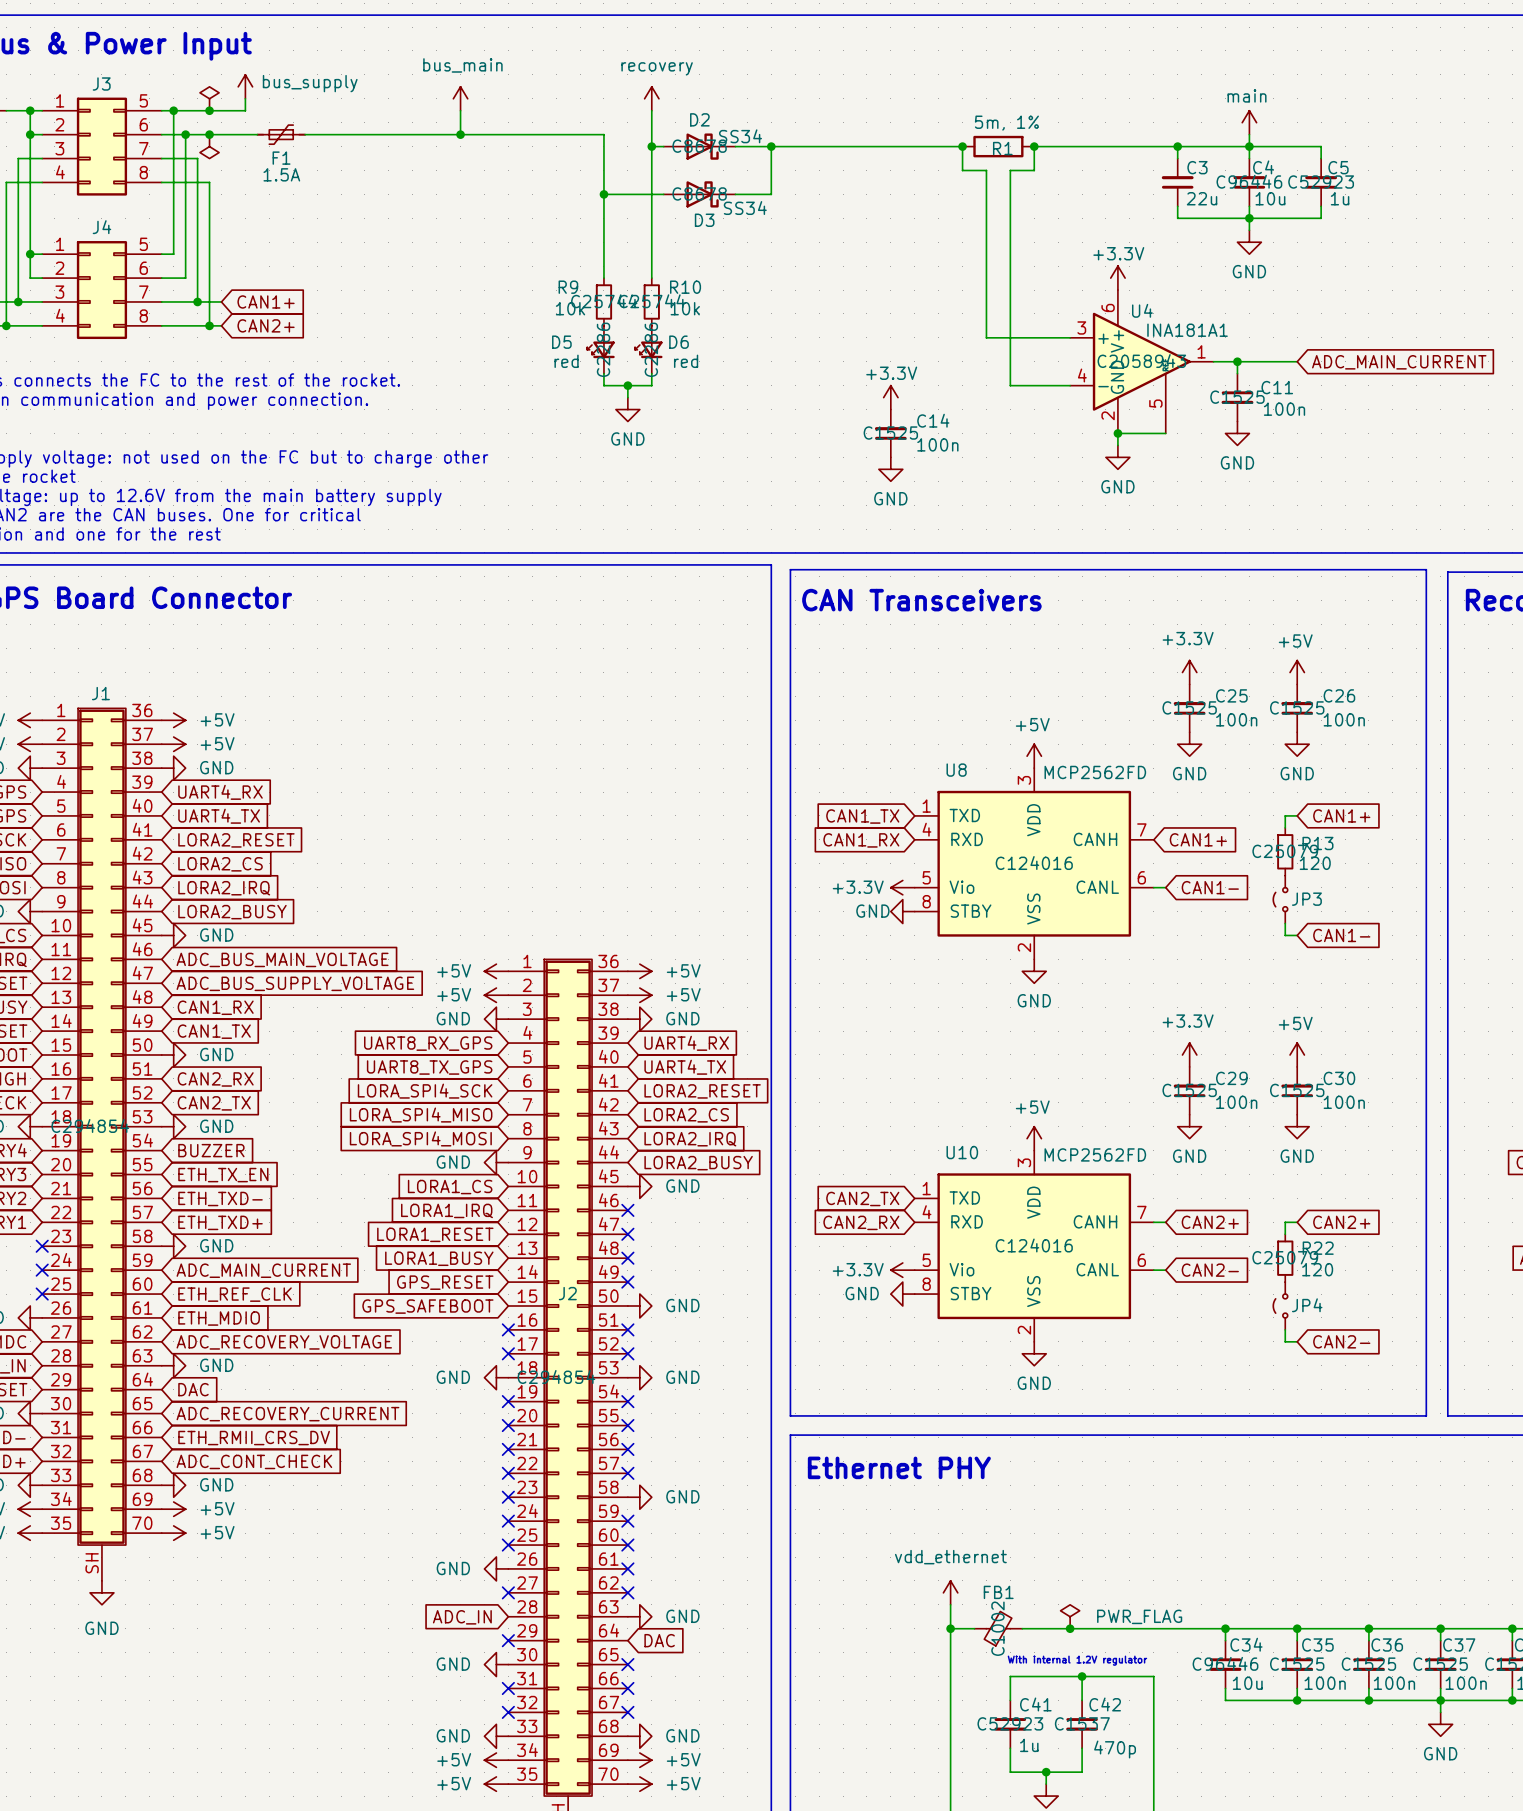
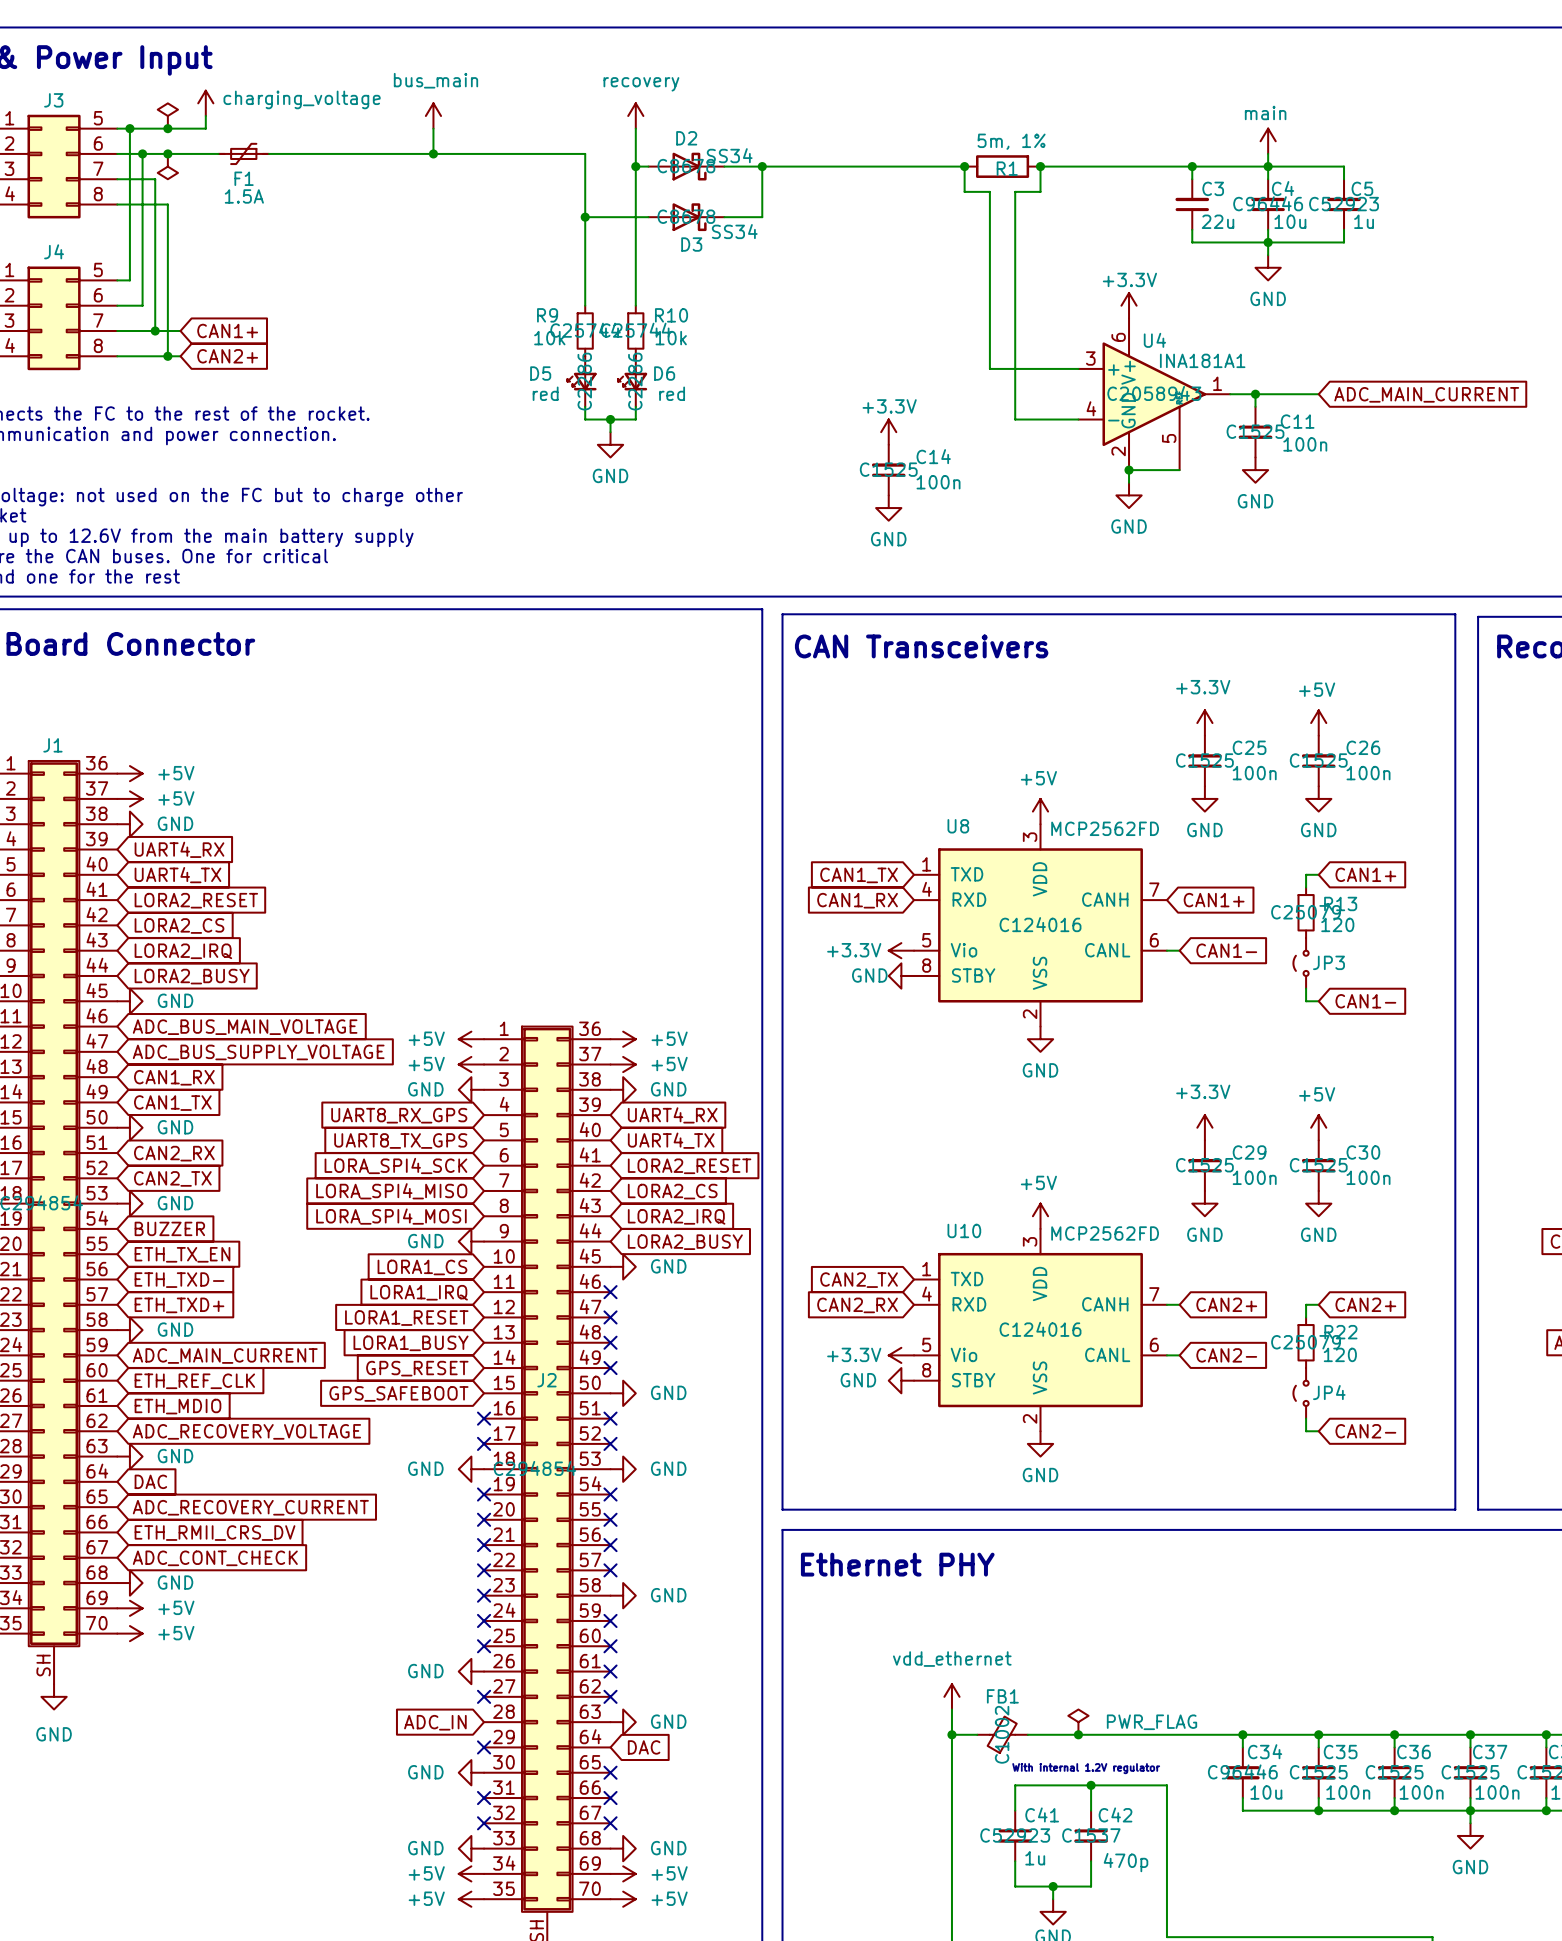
power symbol: bus_supply (245, 86) -> charging_voltage (205, 103)

